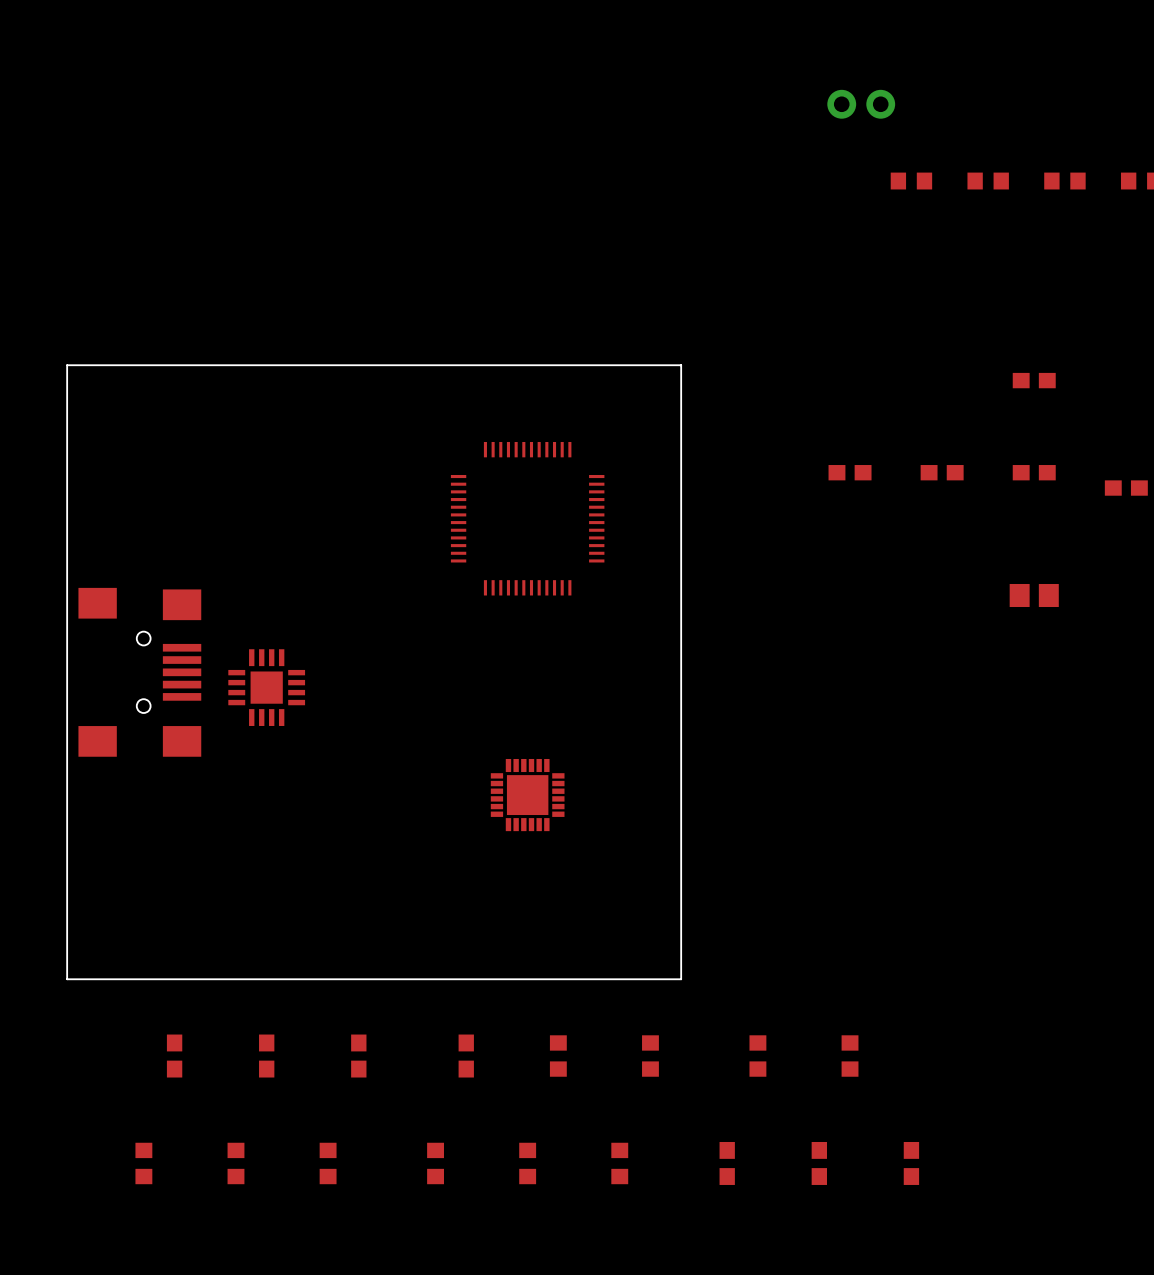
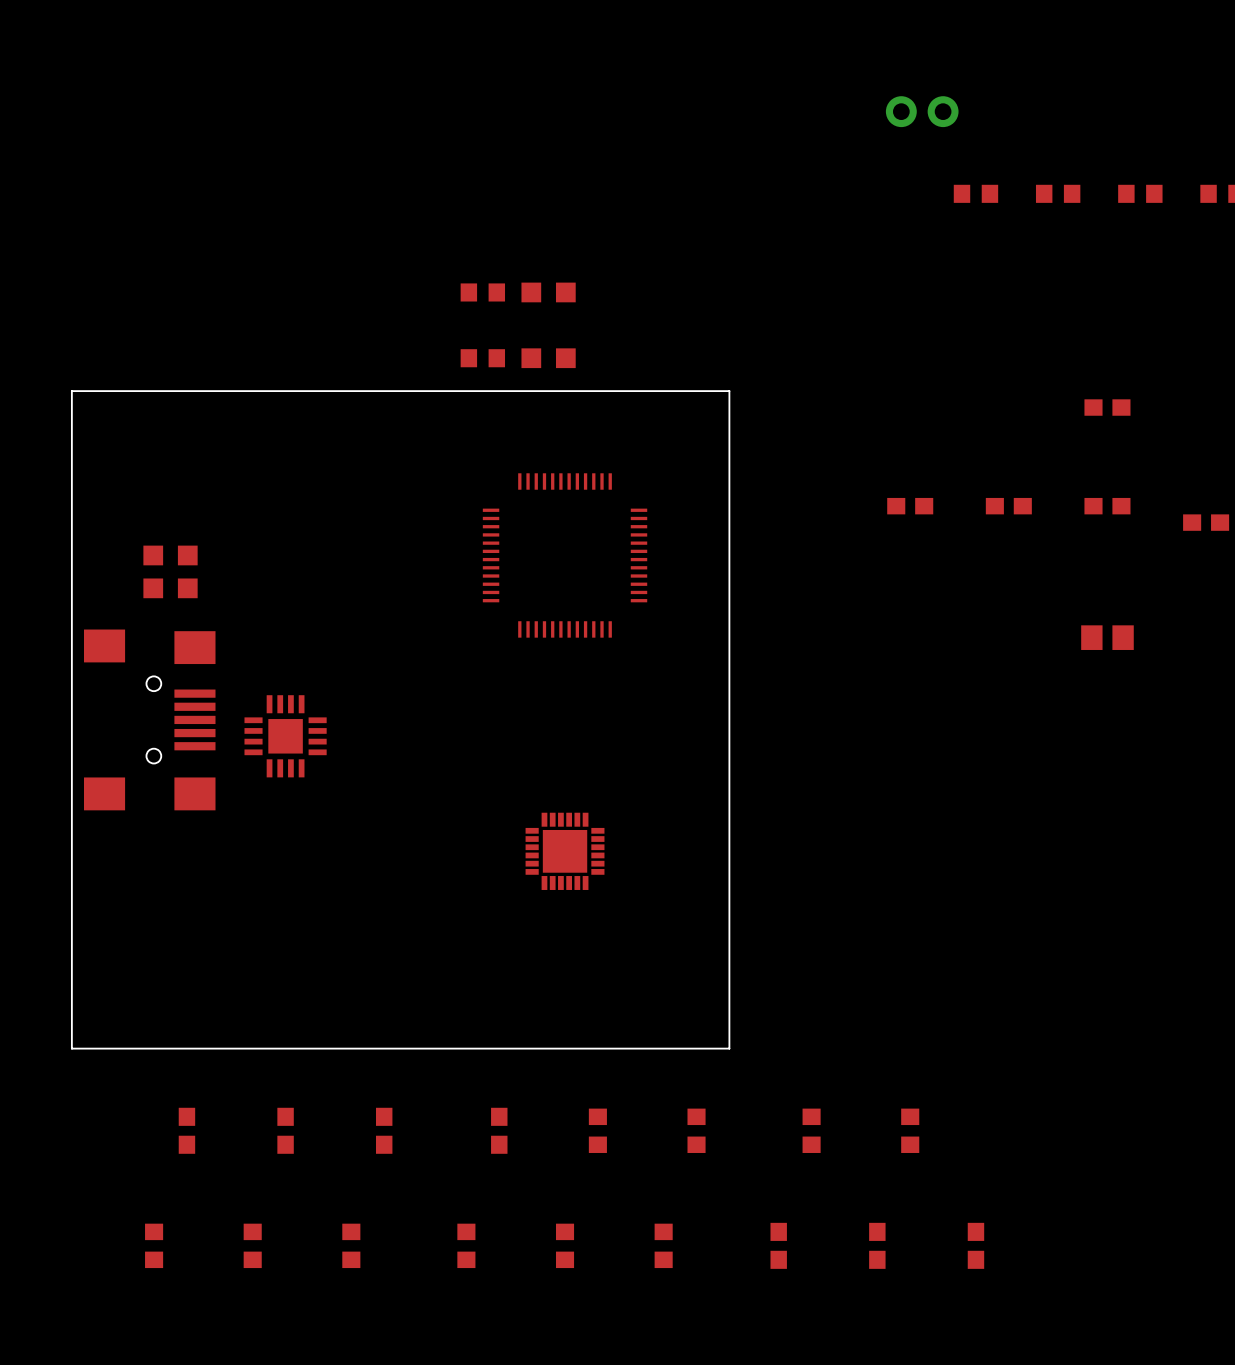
part: none -> (482, 292)
part: none -> (548, 292)
part: none -> (482, 358)
part: none -> (548, 358)
part: none -> (170, 555)
part: none -> (170, 588)

